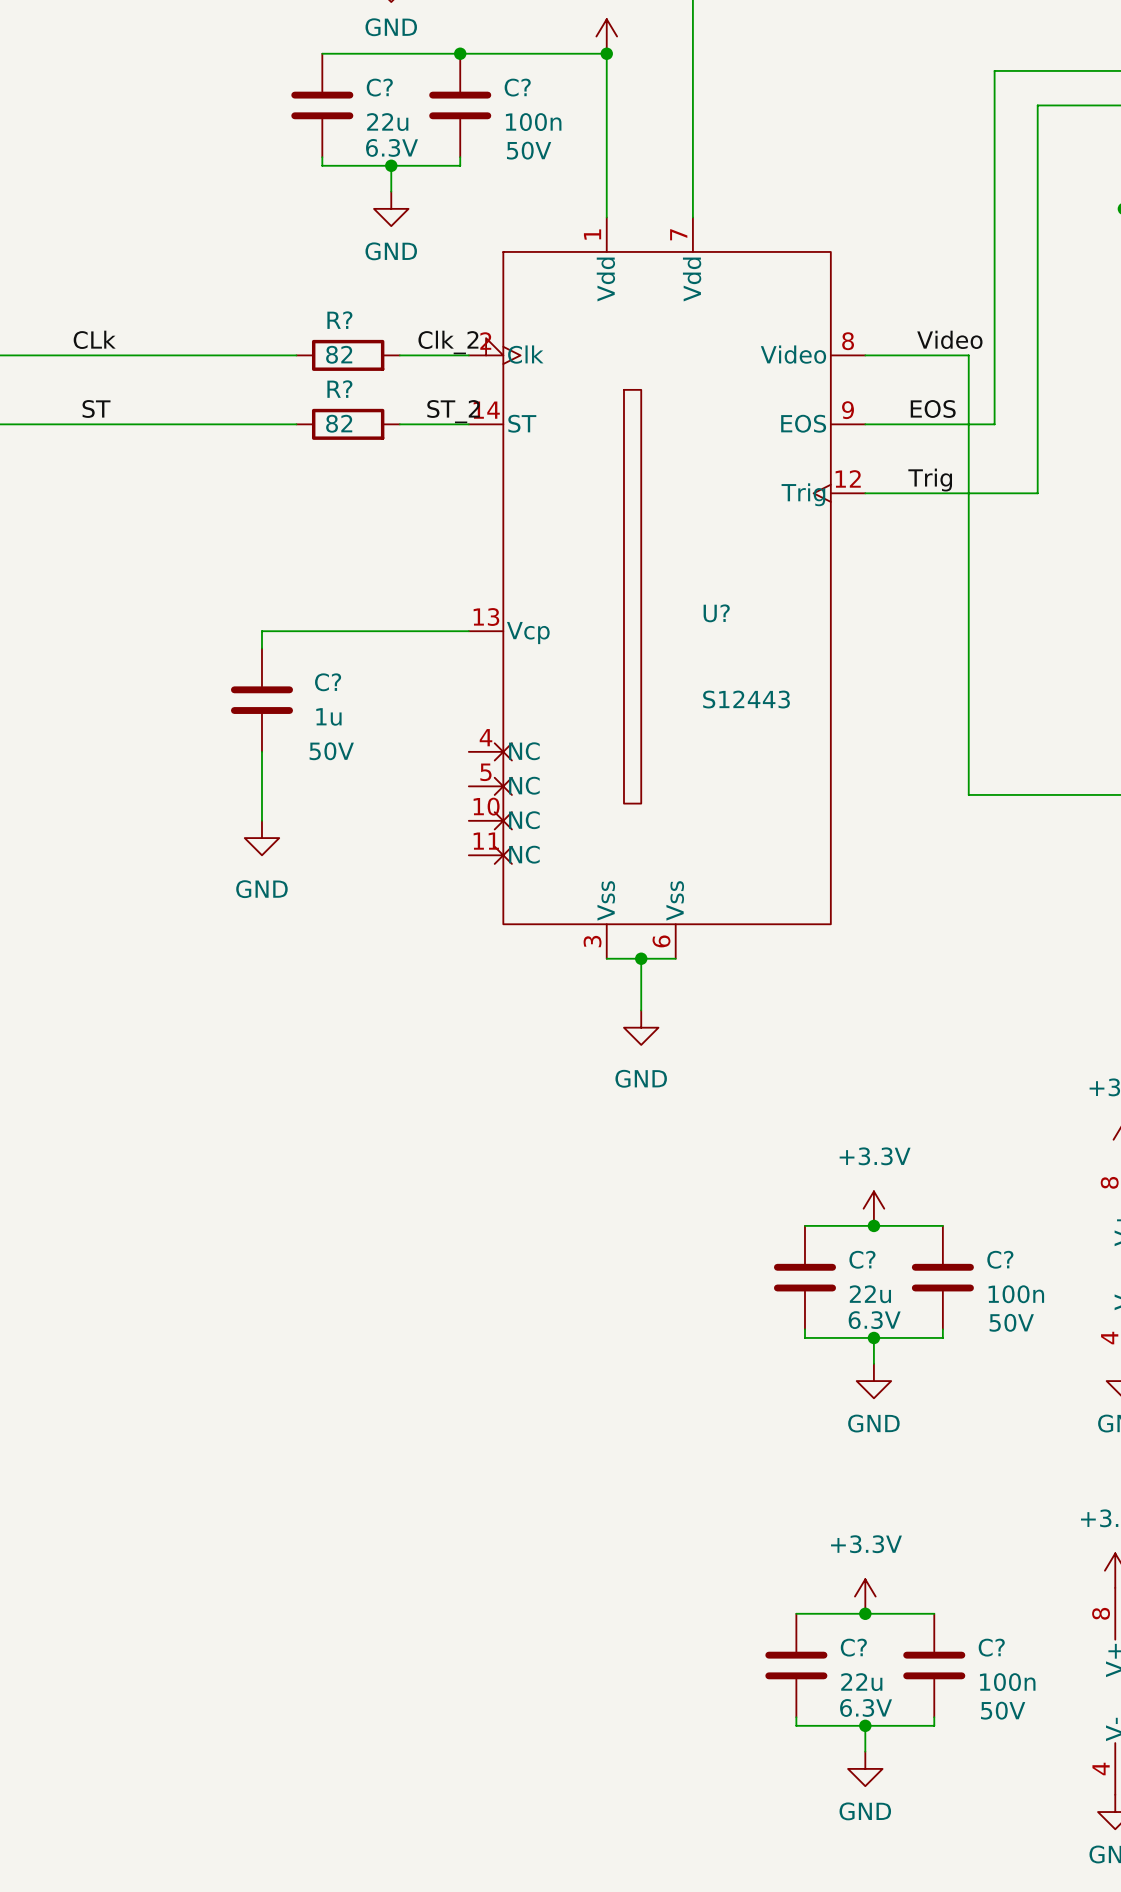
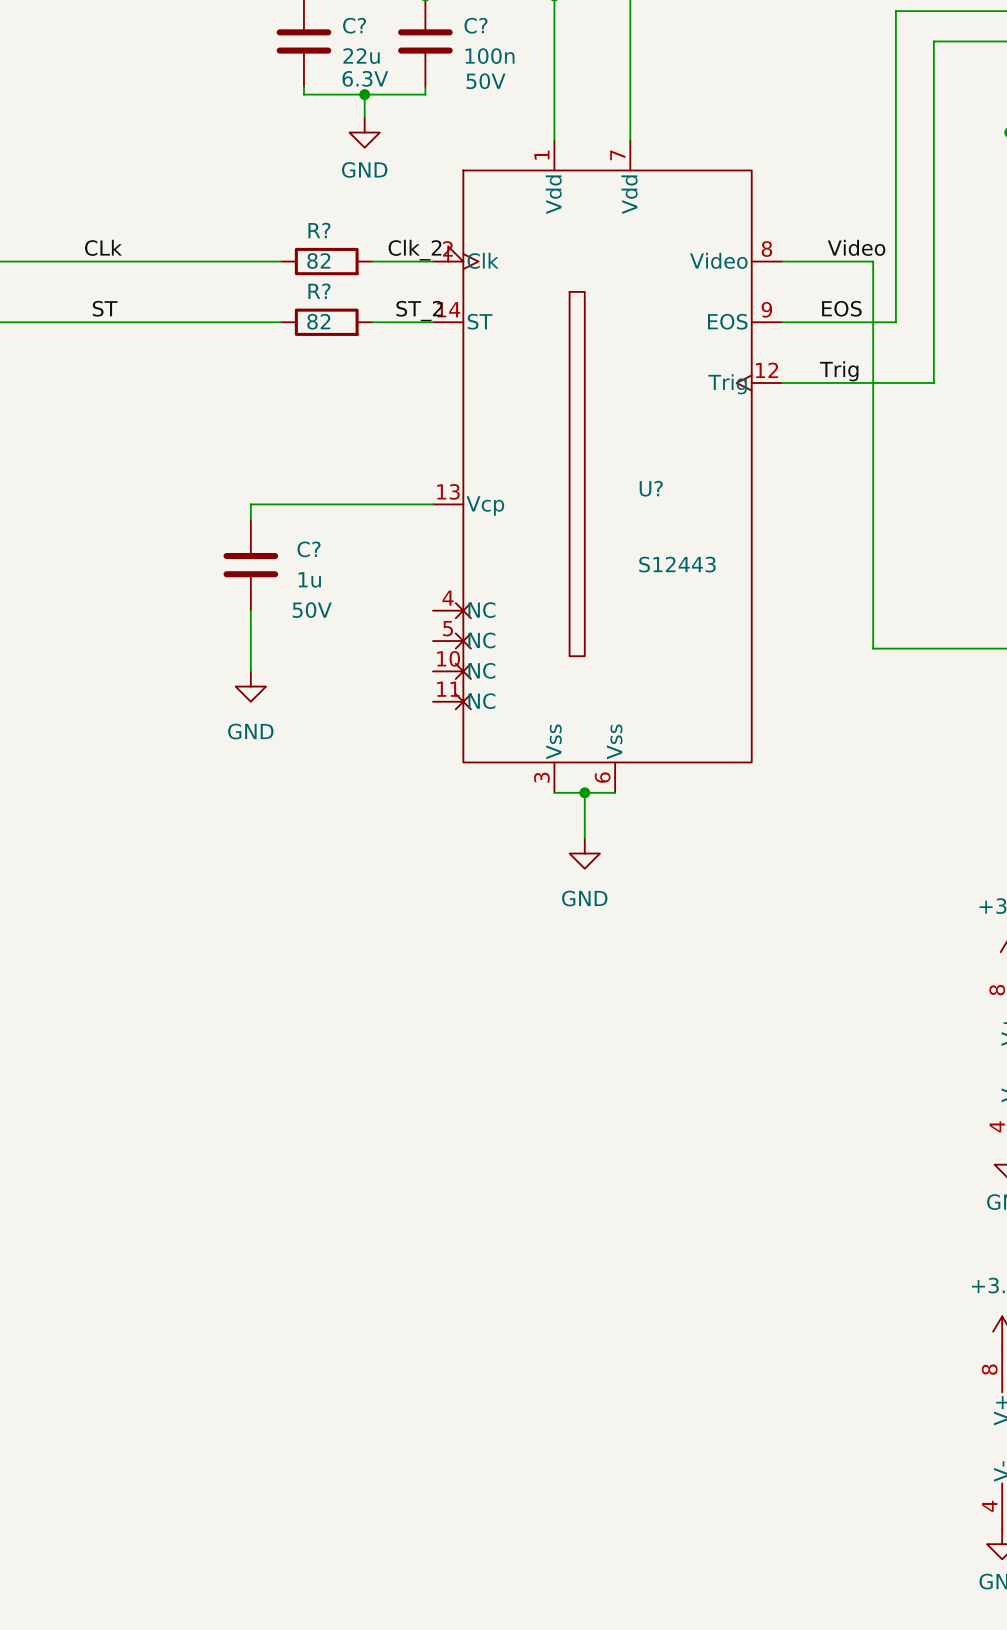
power symbol: +3.3V (873, 1208) -> none
wire: (804, 1225) (942, 1225) -> none
junction: (873, 1225) -> none
C?: 22u (804, 1277) -> none
C?: 100n (942, 1277) -> none
wire: (804, 1329) (804, 1337) (942, 1337) (942, 1329) -> none
wire: (873, 1337) (873, 1363) -> none
junction: (873, 1337) -> none
power symbol: GND (873, 1381) -> none
power symbol: +3.3V (865, 1596) -> none
wire: (796, 1613) (934, 1613) -> none
junction: (865, 1613) -> none
C?: 22u (796, 1665) -> none
C?: 100n (934, 1665) -> none
wire: (796, 1717) (796, 1725) (934, 1725) (934, 1717) -> none
wire: (865, 1725) (865, 1751) -> none
junction: (865, 1725) -> none
power symbol: GND (865, 1768) -> none

